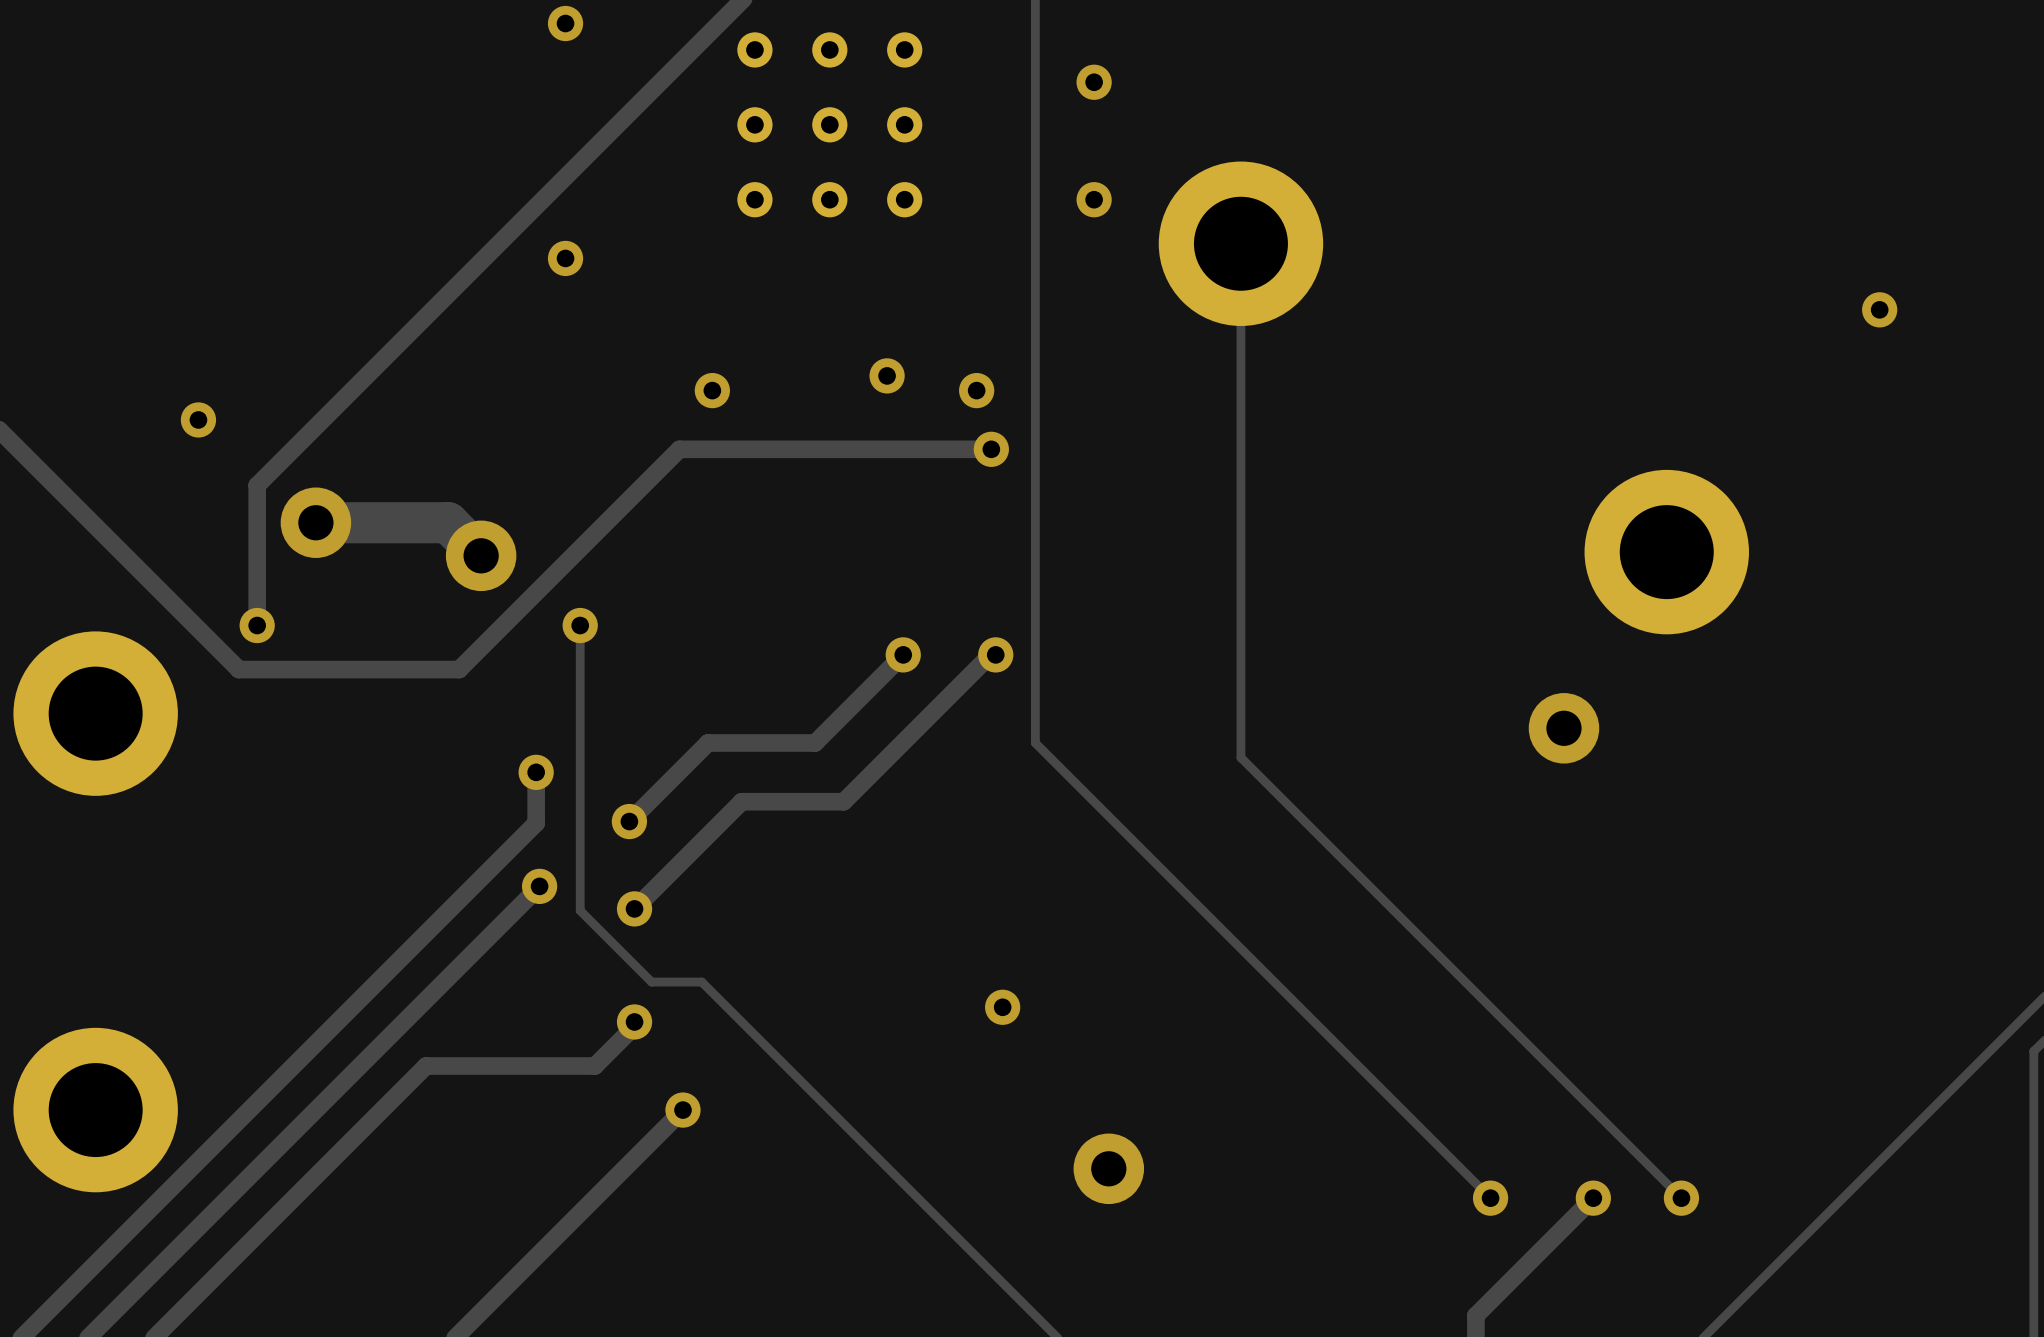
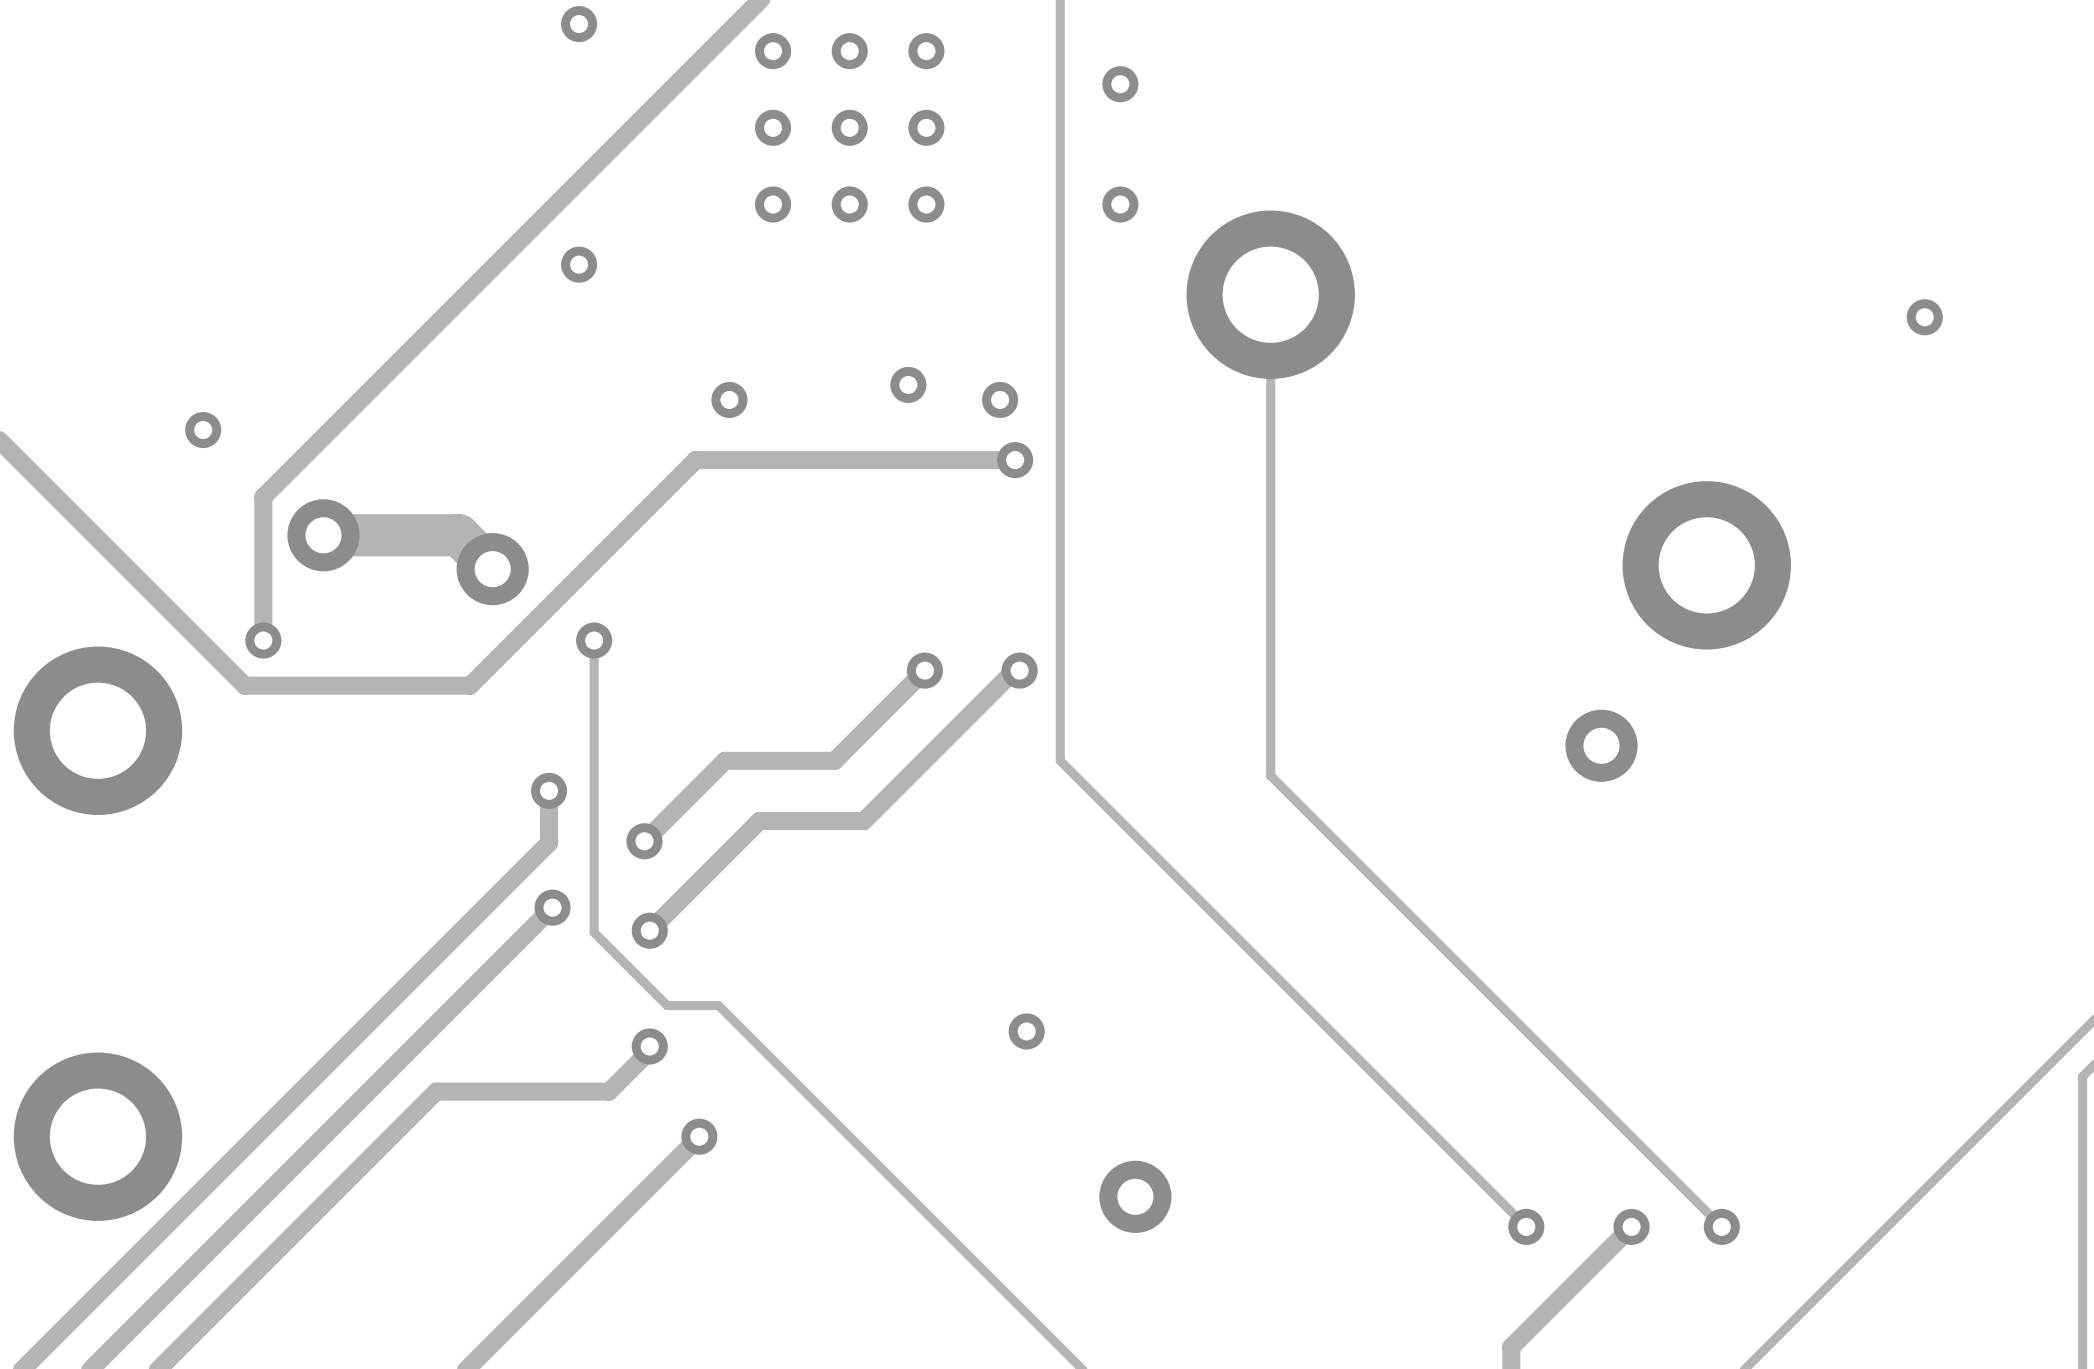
part position: (1240, 243) -> (1270, 294)

